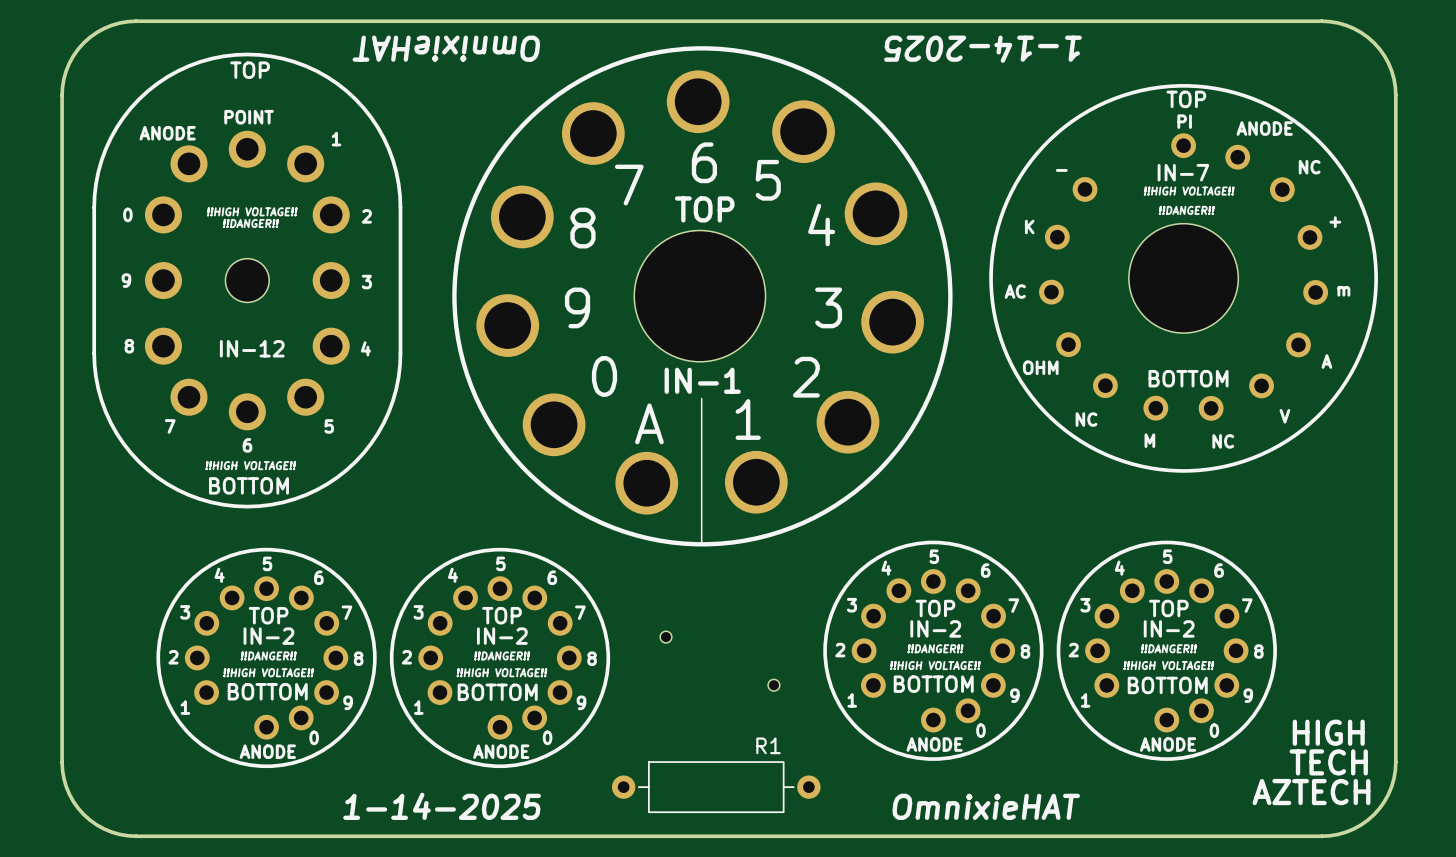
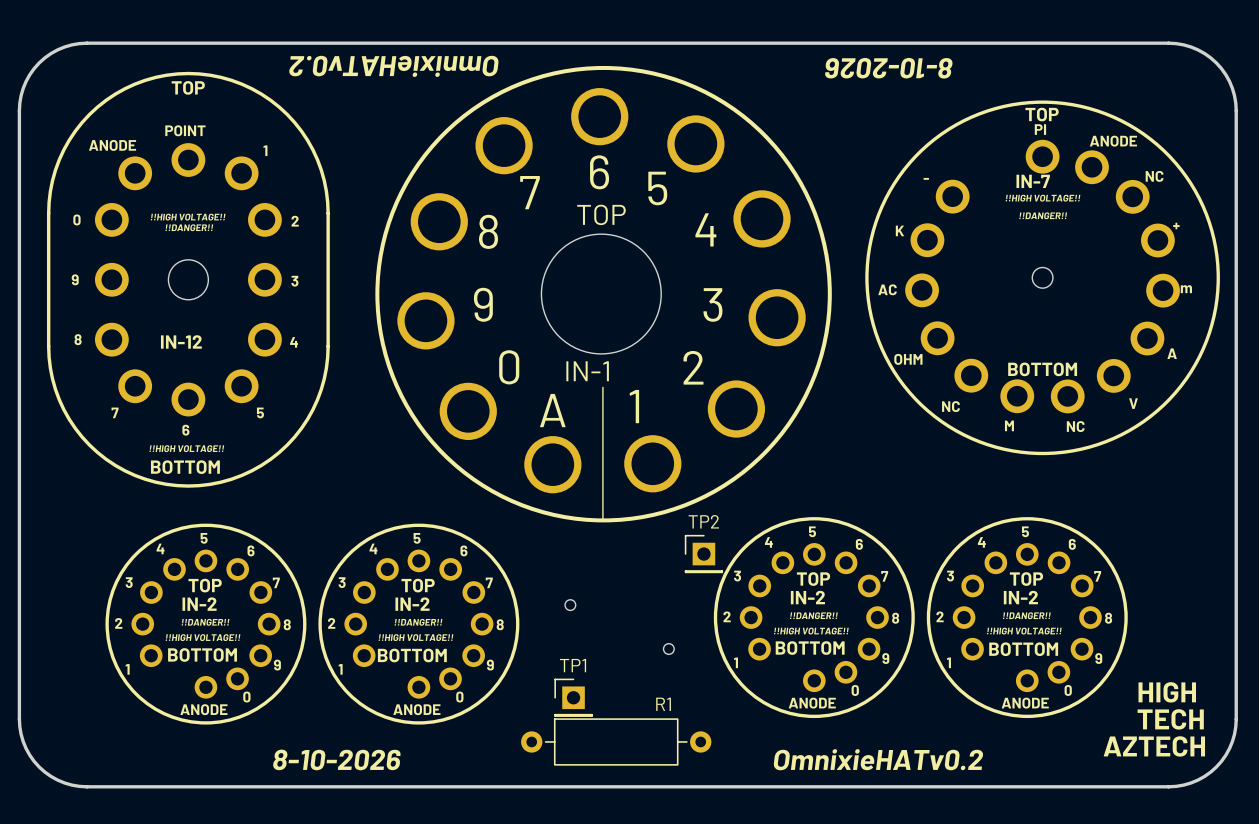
text: OmnixieHAT (446, 48) -> OmnixieHATv0.2 (393, 66)
text: 1-14-2025 (983, 49) -> 8-10-2026 (888, 68)
part footprint: [989, 84, 1378, 473] -> [865, 100, 1220, 456]
TP2: none -> (703, 554)
TP1: none -> (573, 697)
text: 1-14-2025 (442, 806) -> 8-10-2026 (336, 759)
text: OmnixieHAT (986, 806) -> OmnixieHATv0.2 (878, 759)

